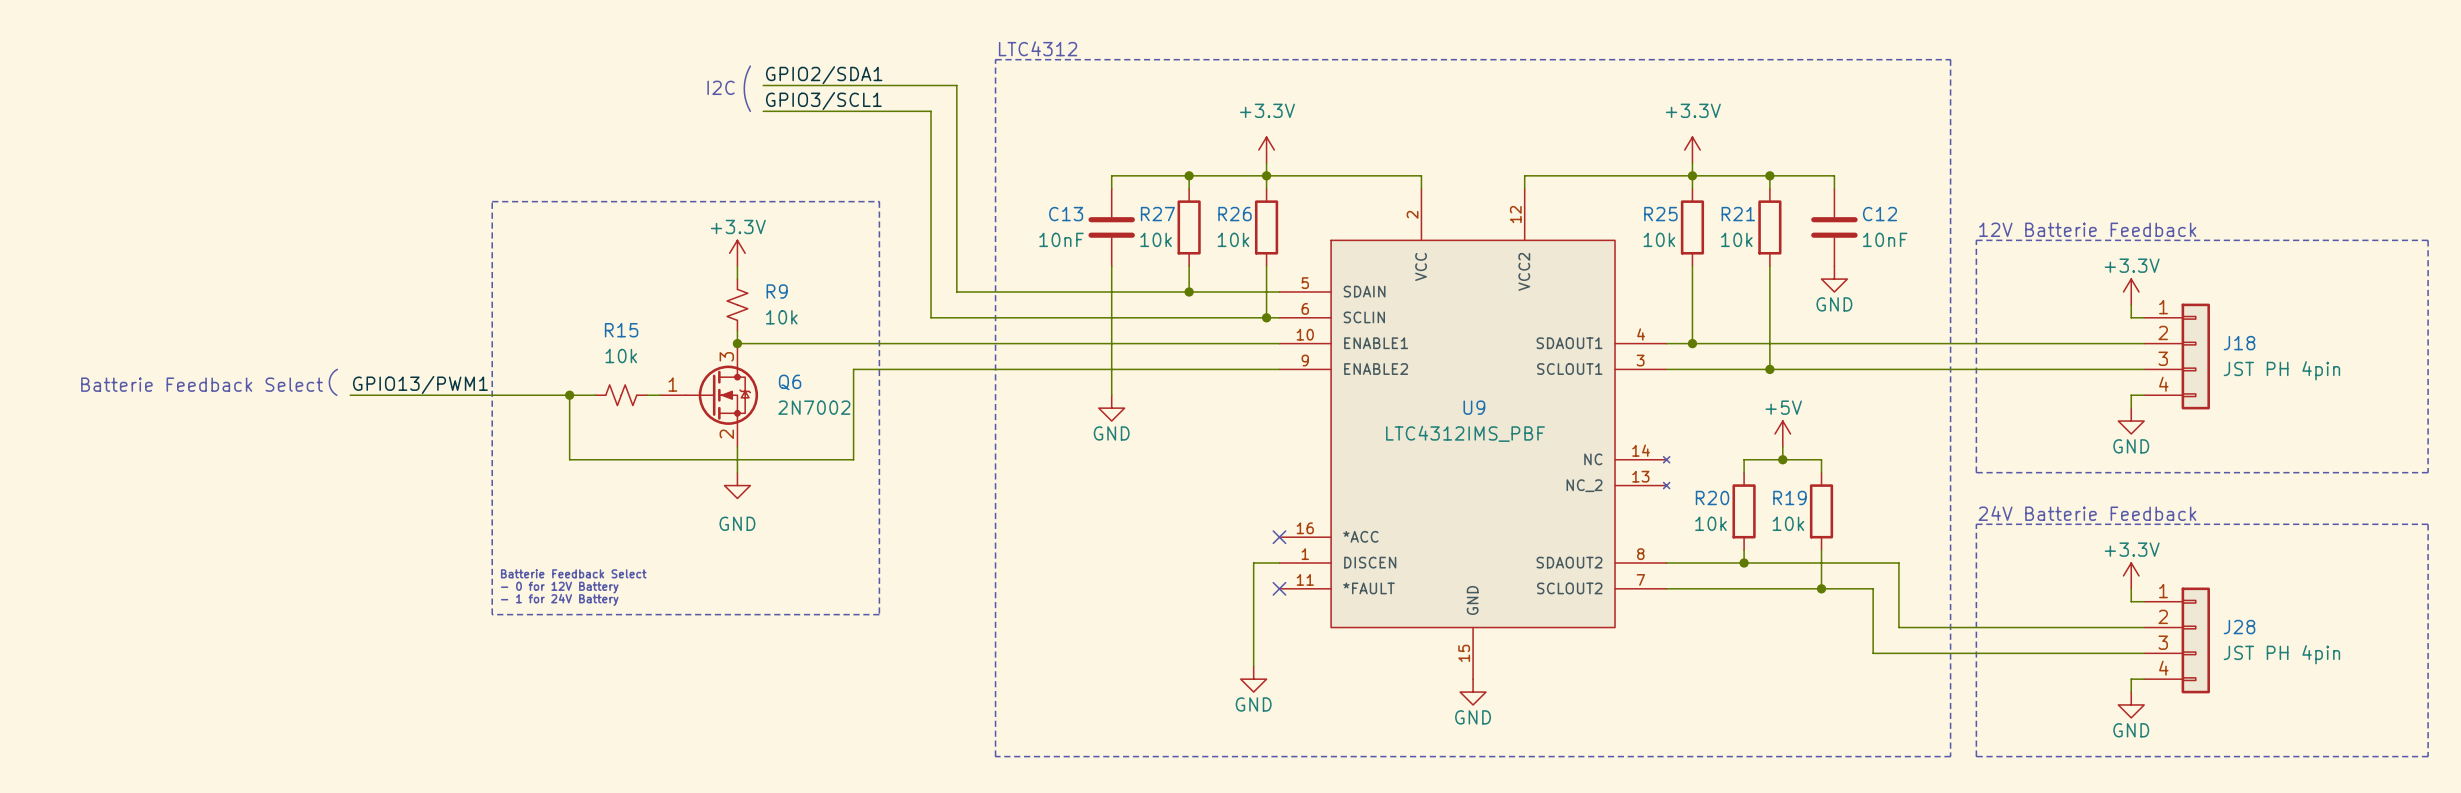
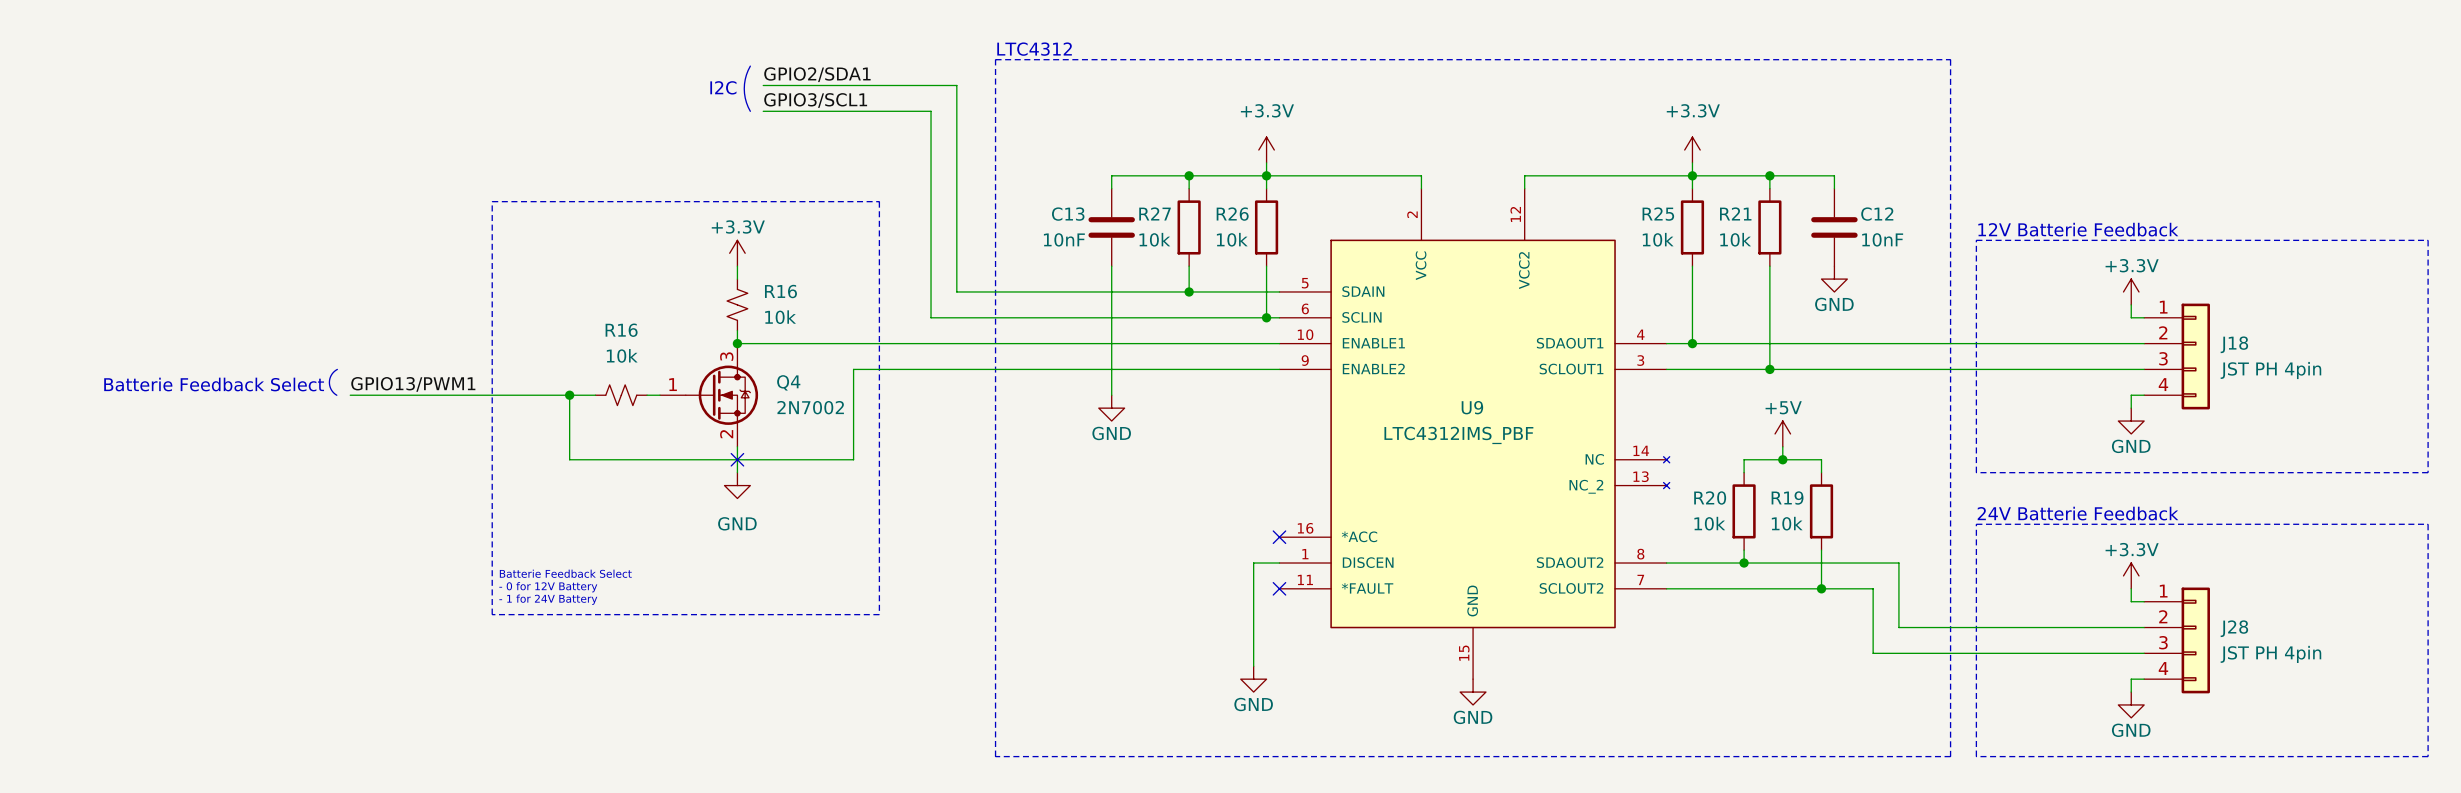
R9 name: R9 (777, 291) -> R16 (780, 291)
R15 name: R15 (621, 330) -> R16 (621, 330)
Q6 name: Q6 (790, 382) -> Q4 (788, 382)
no-connect mark: none -> (737, 459)

